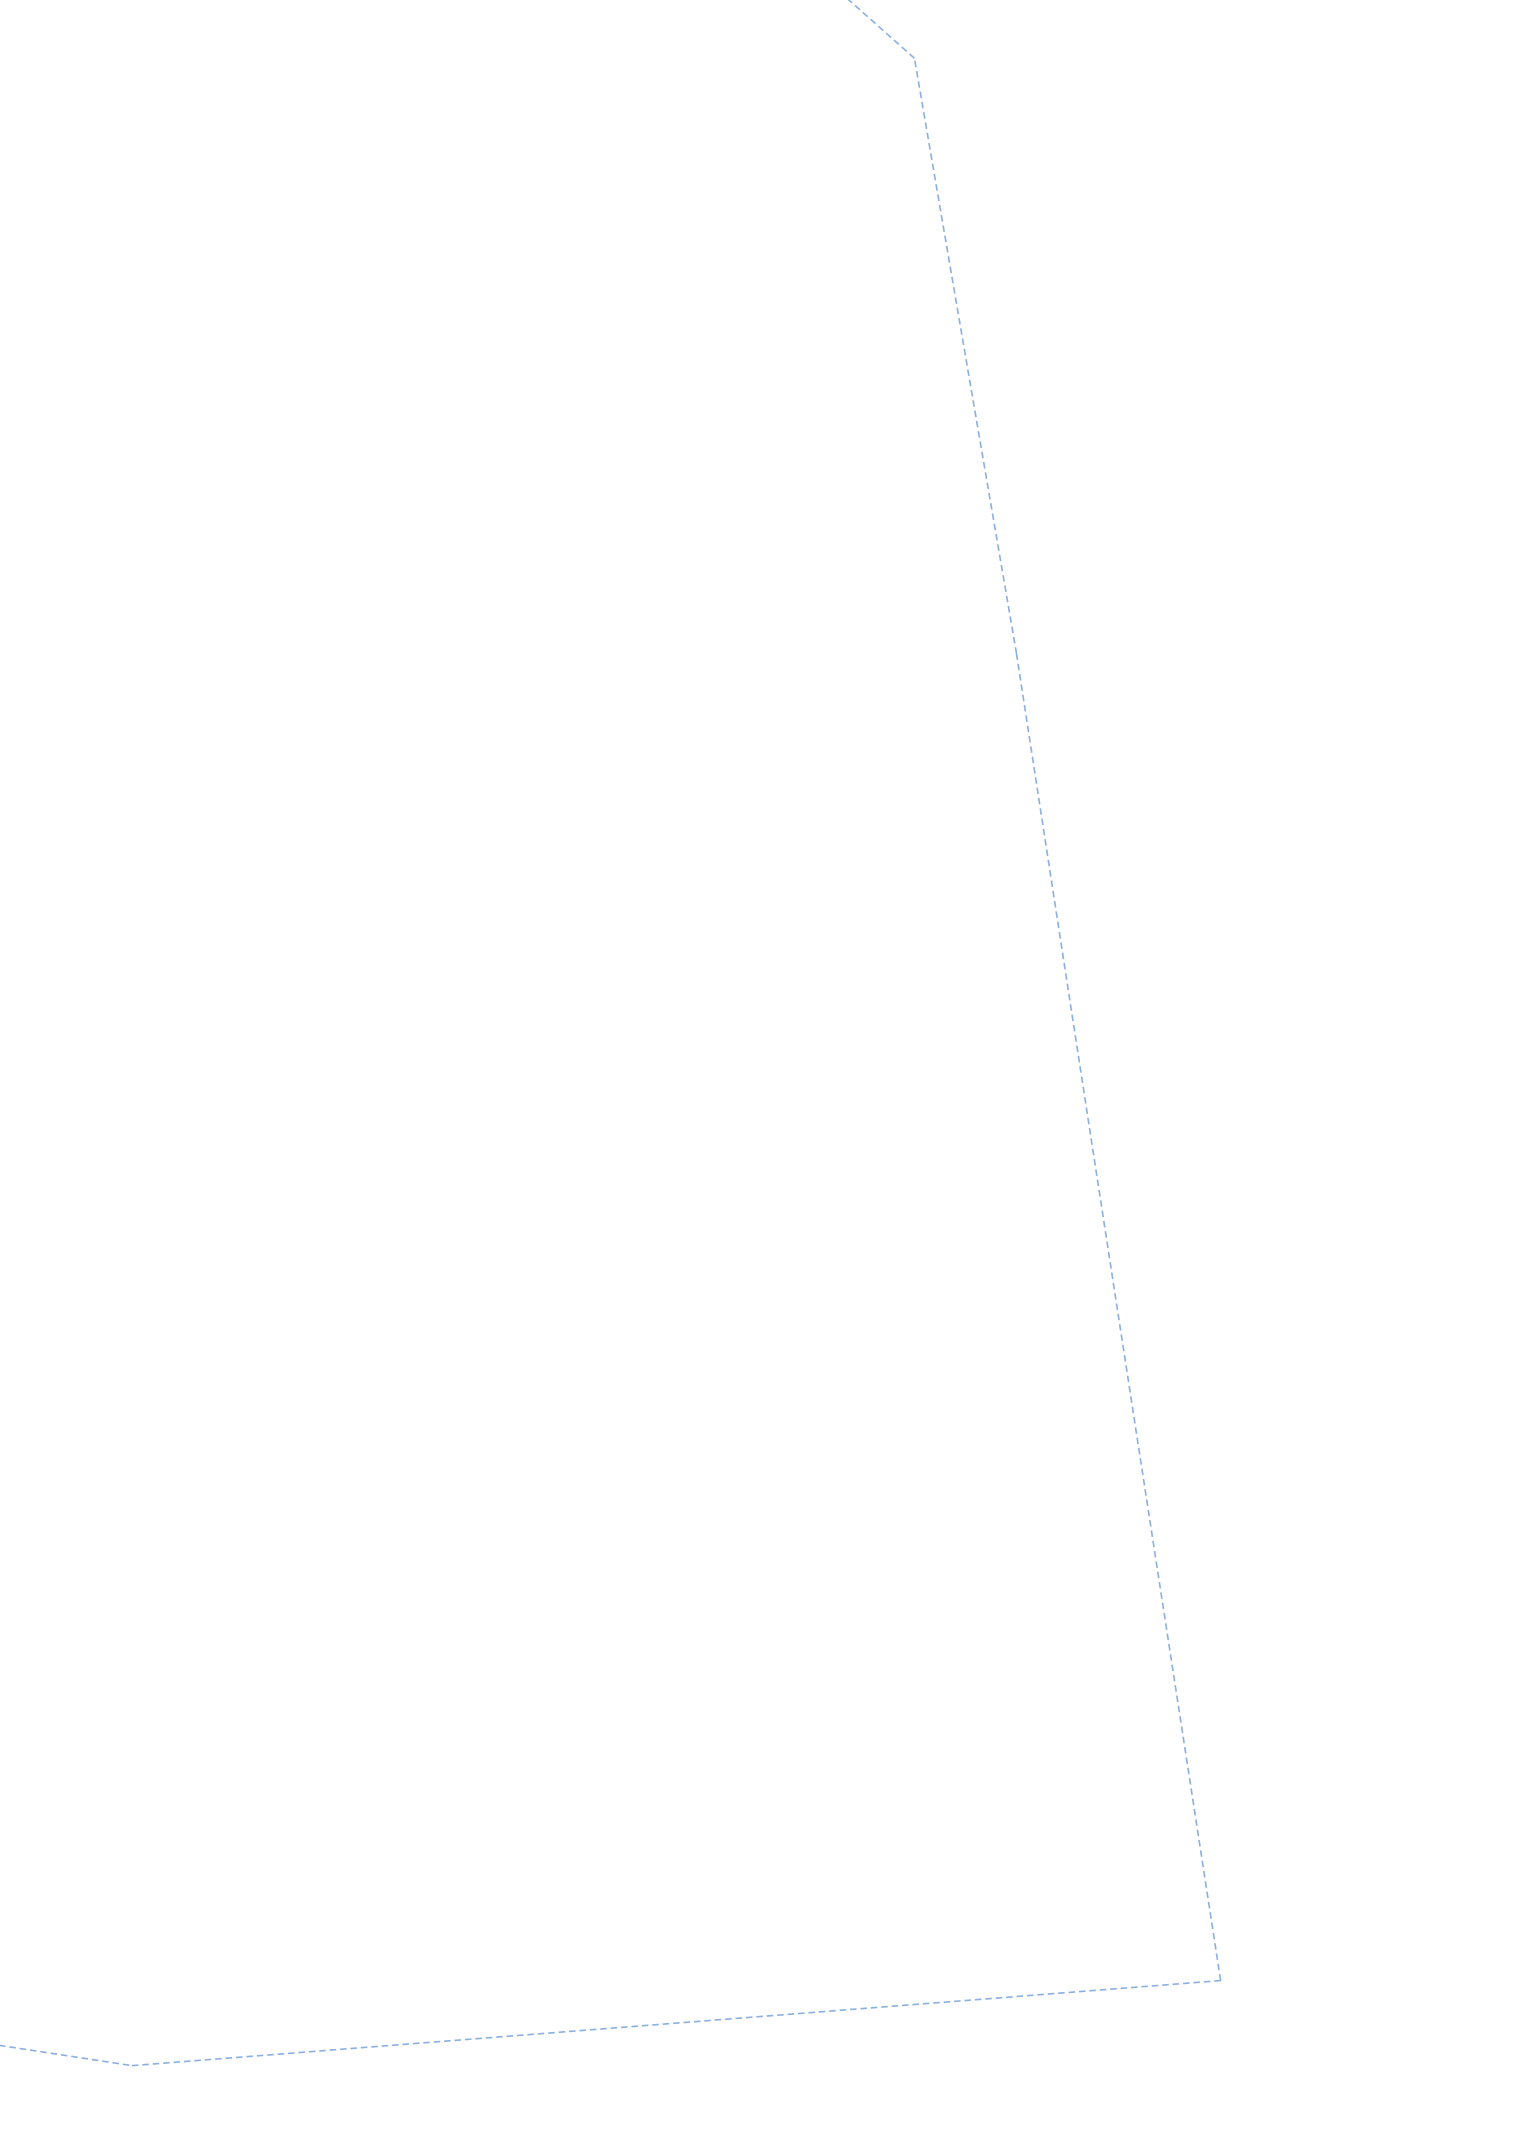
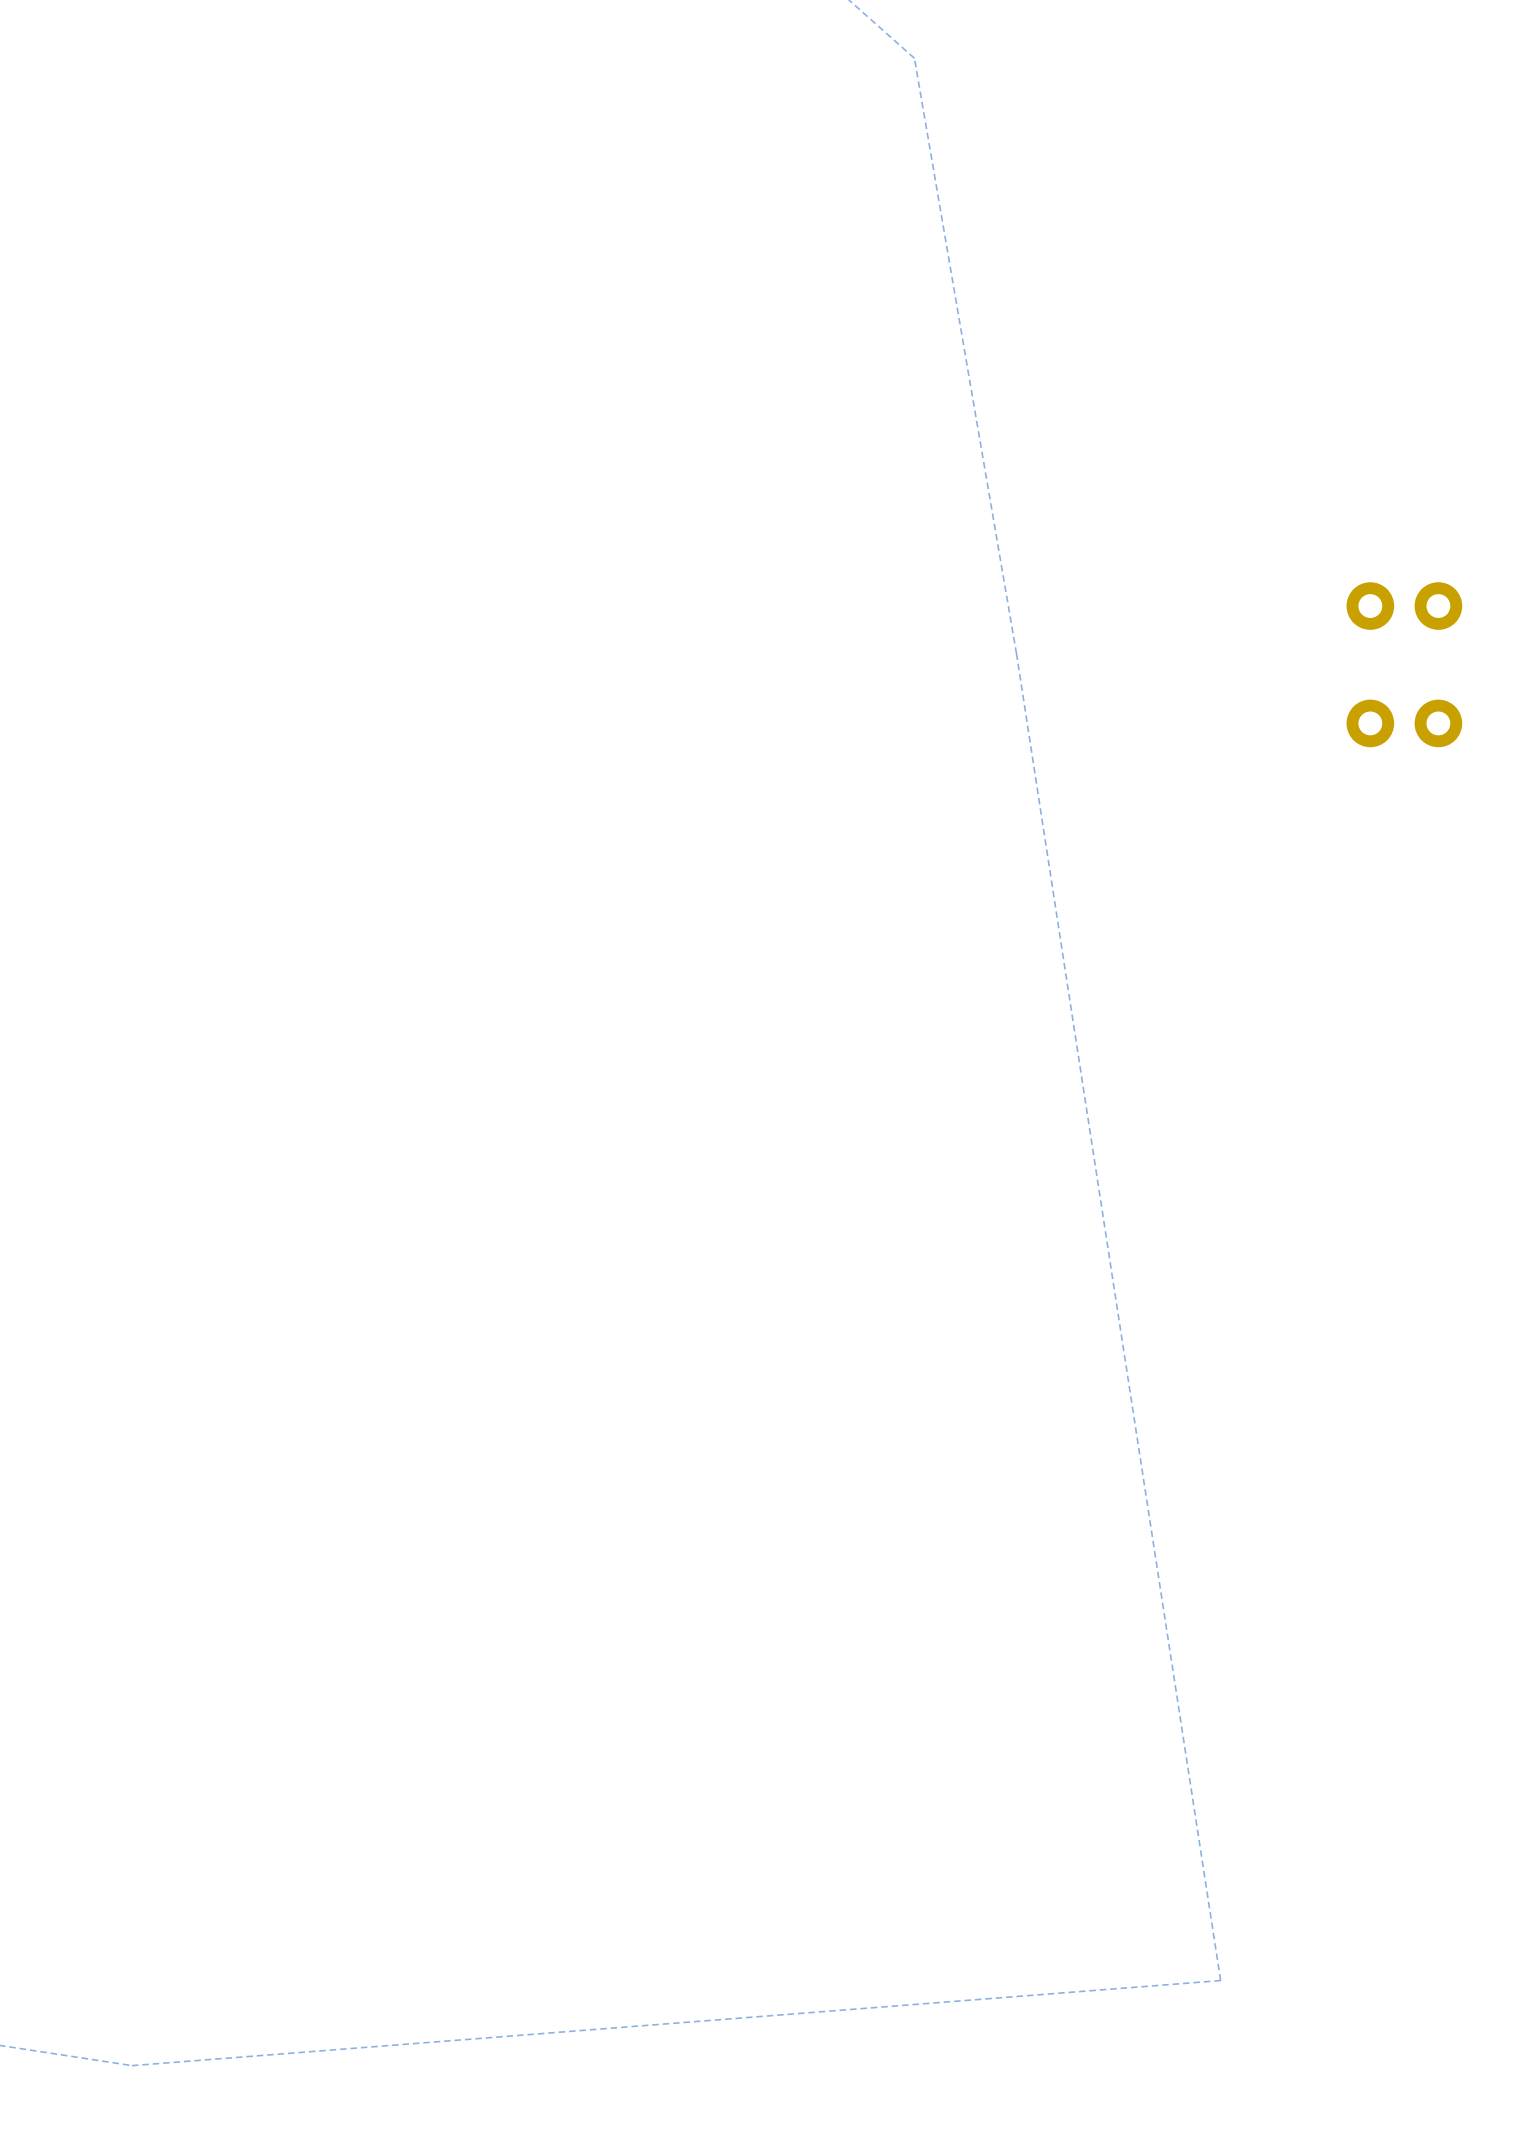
part: none -> (1404, 606)
part: none -> (1404, 723)

